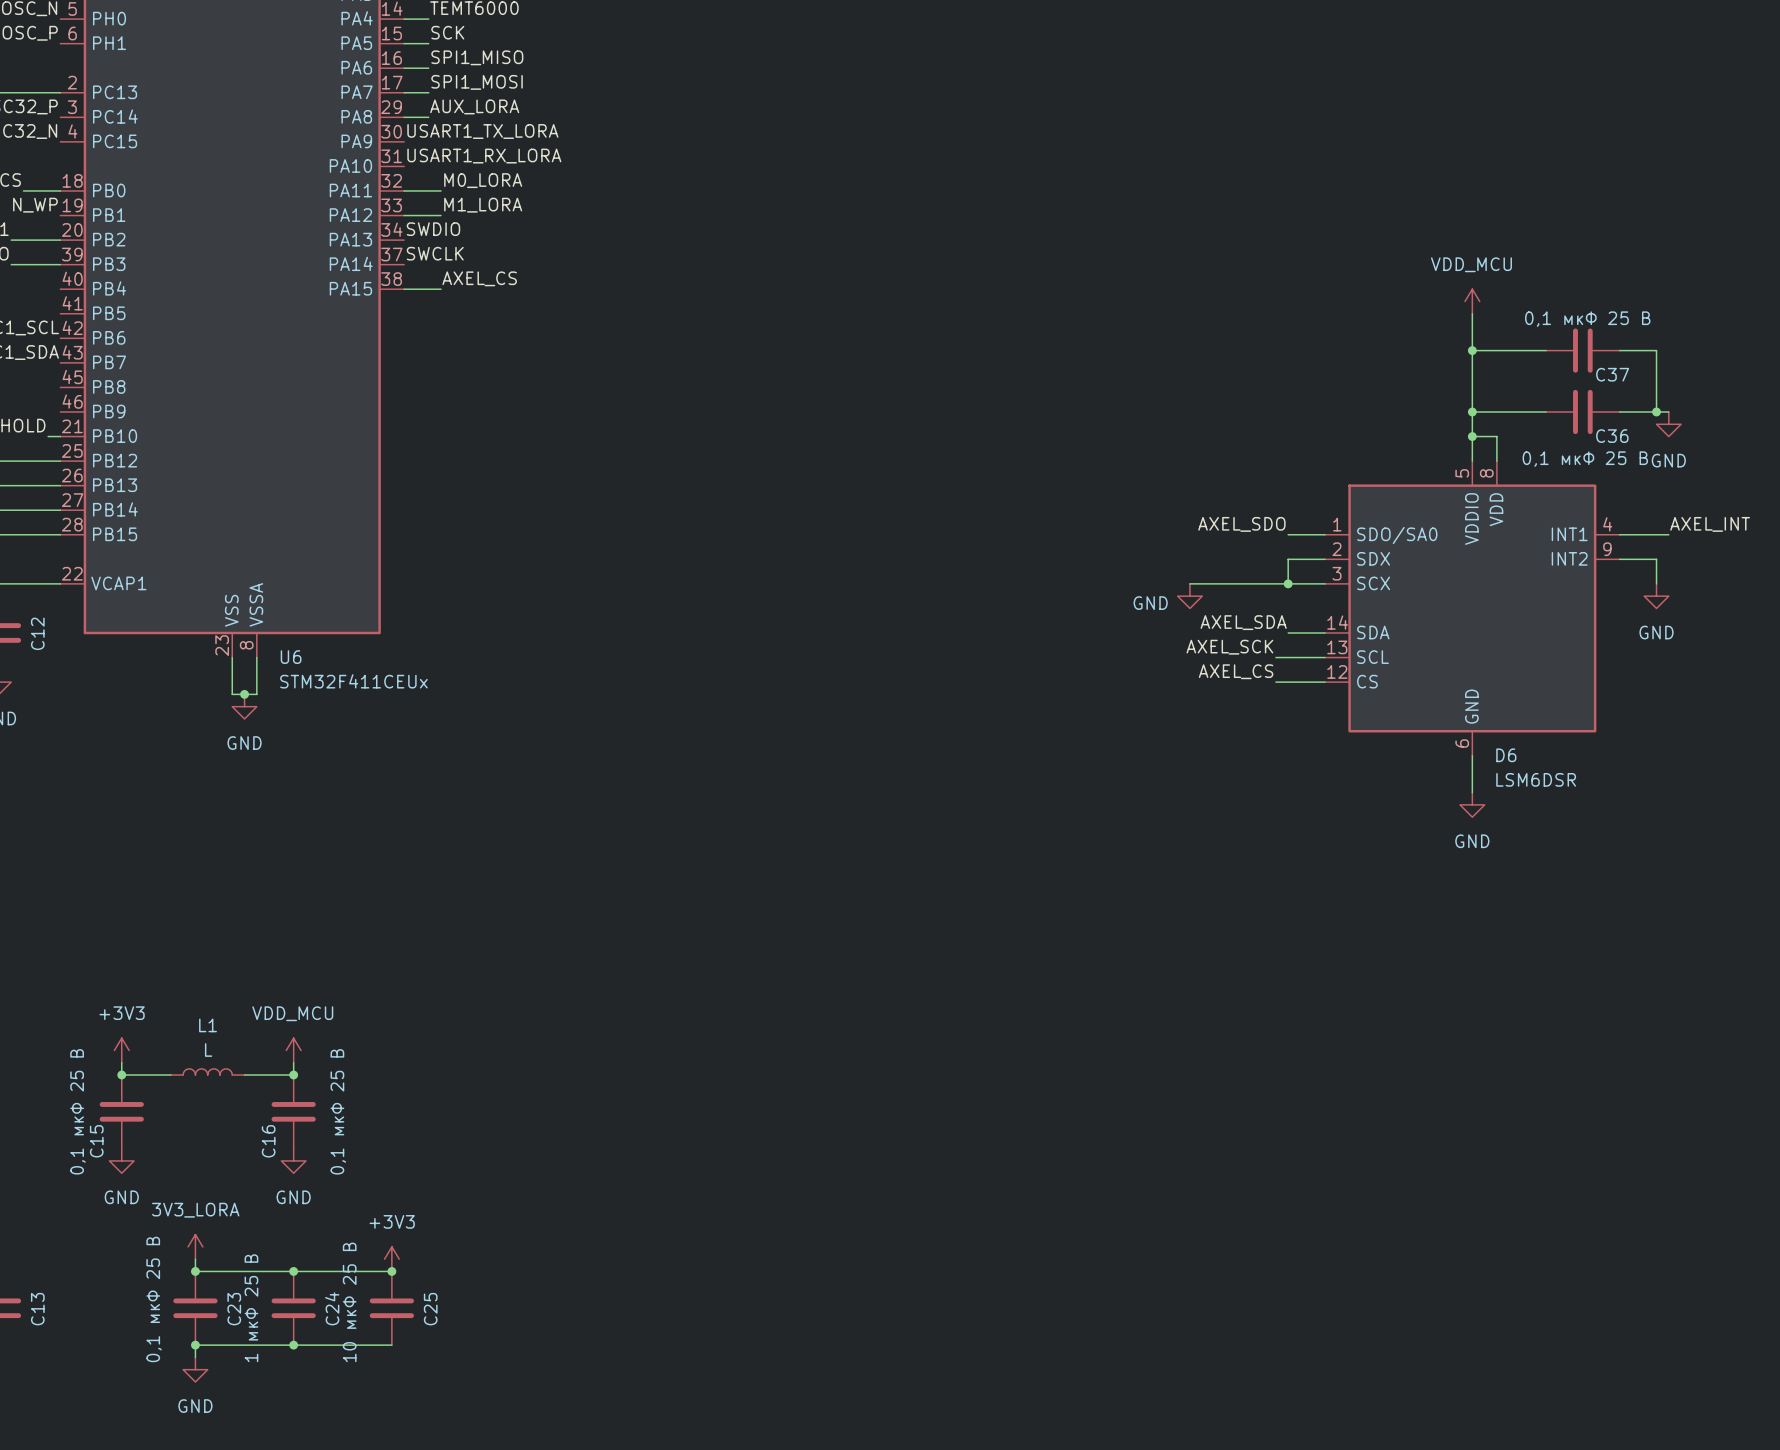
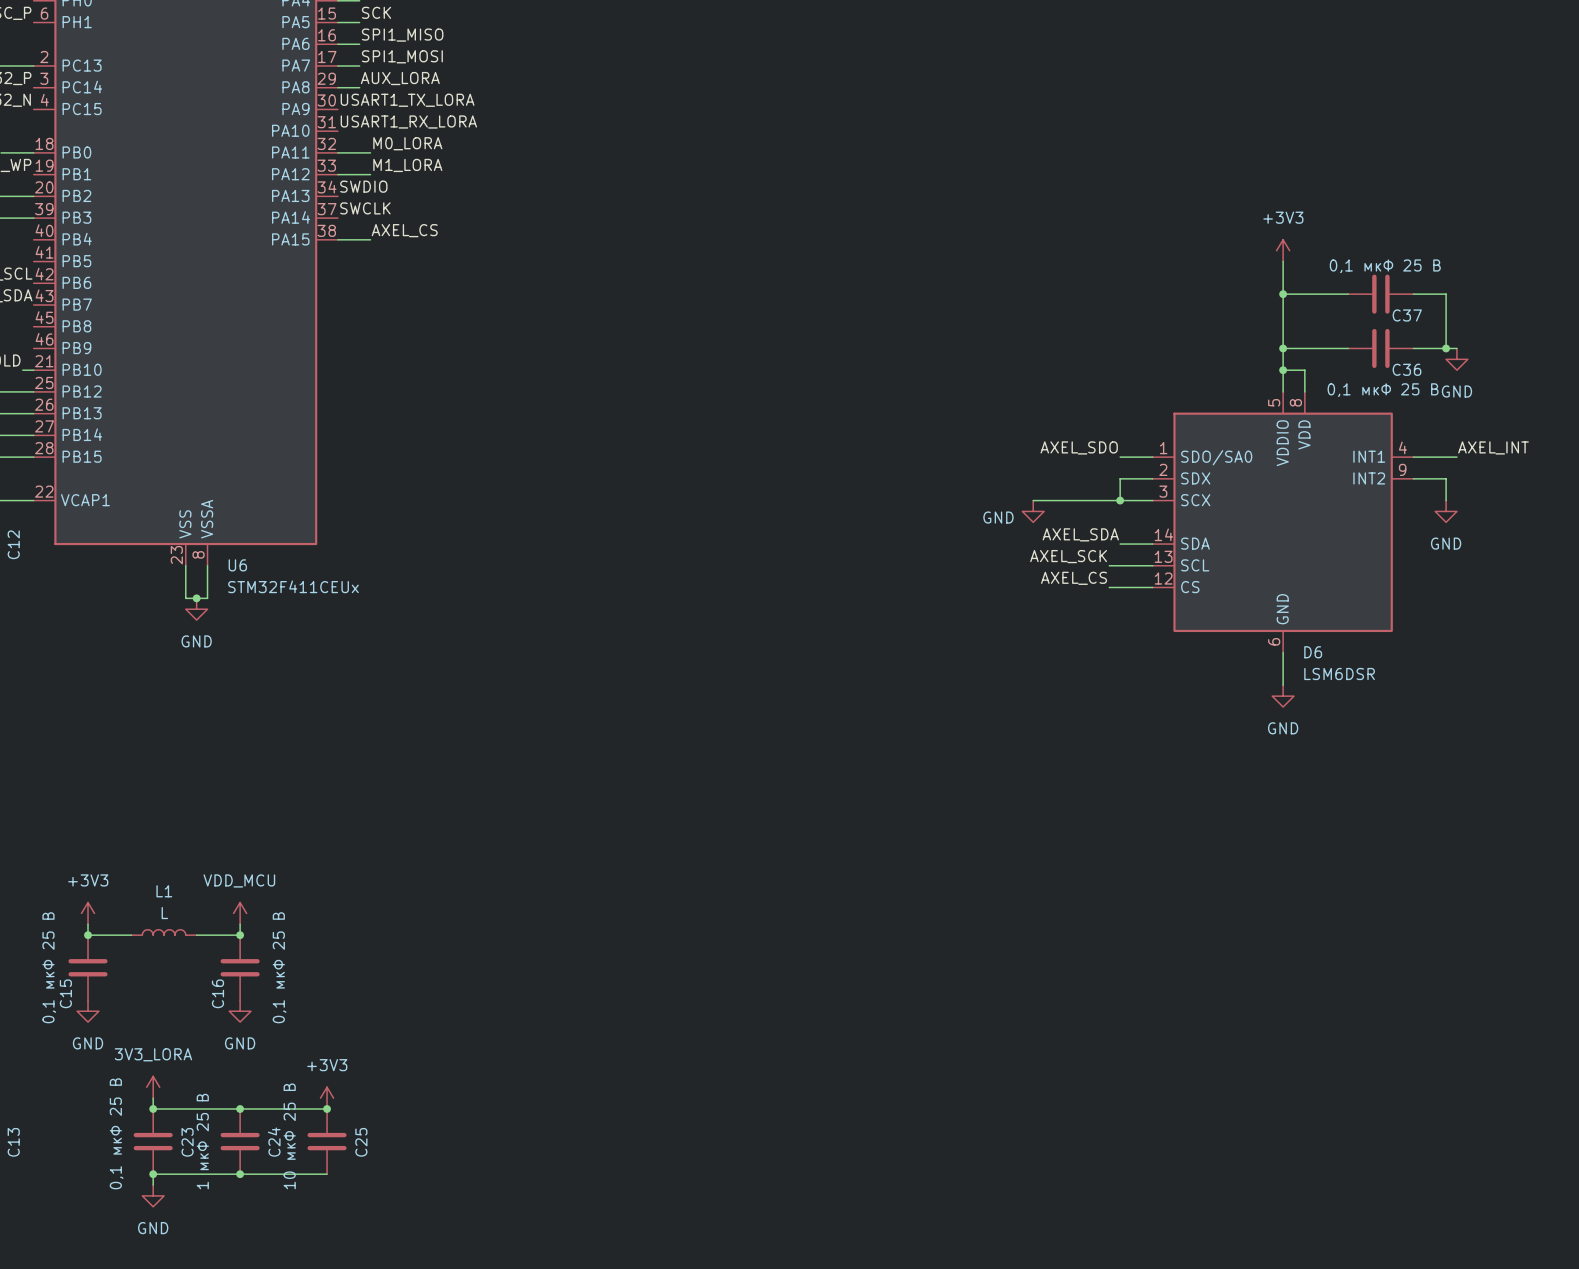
power symbol: VDD_MCU (1472, 301) -> +3V3 (1283, 250)

